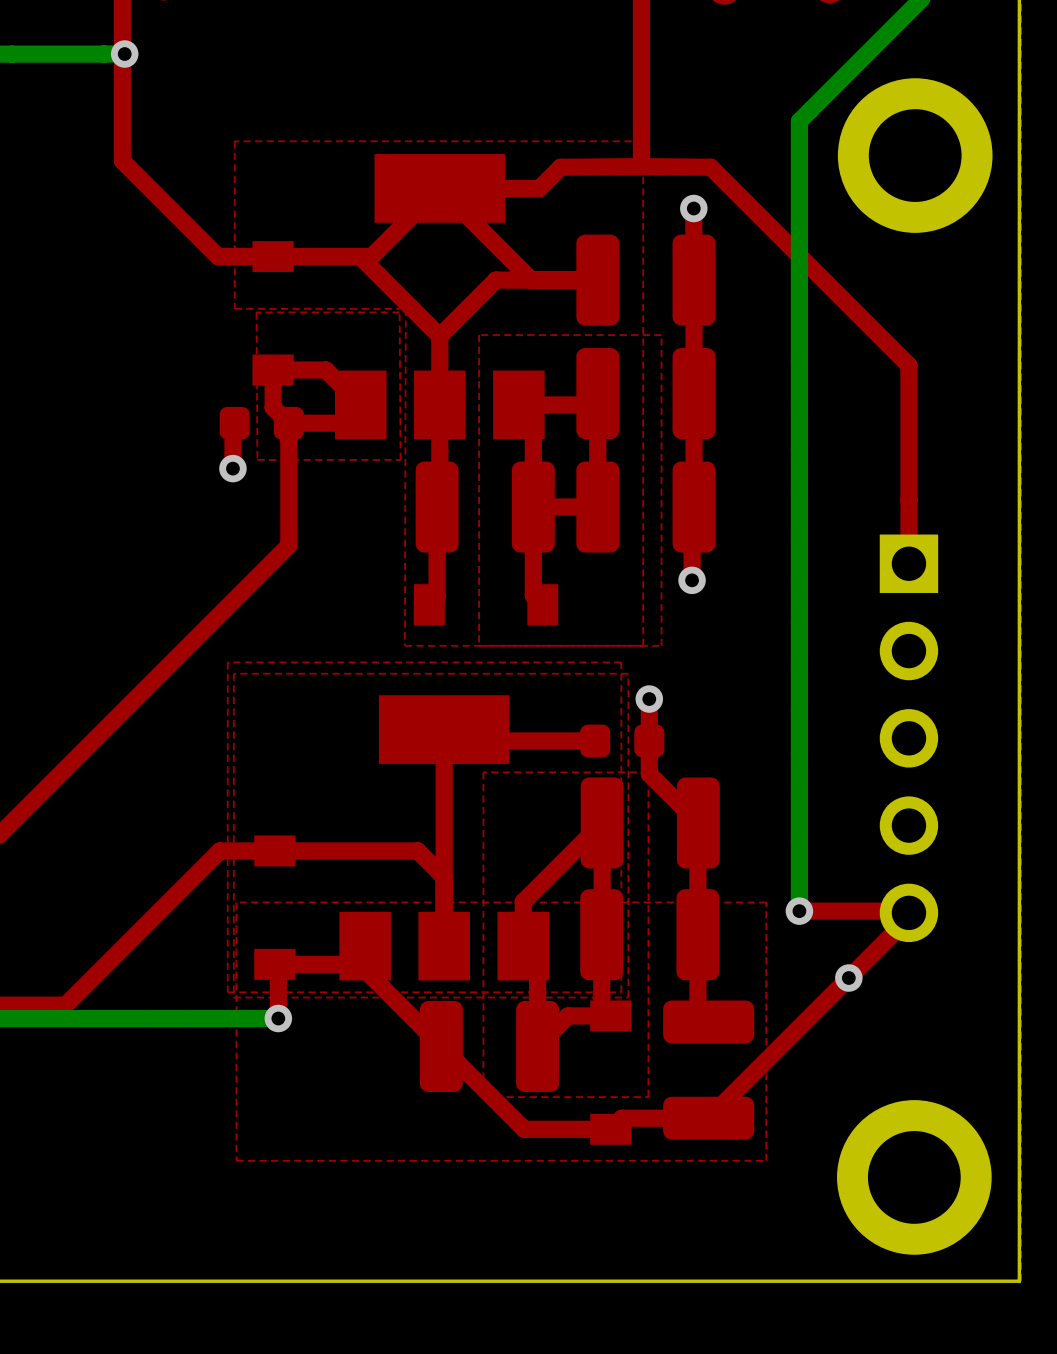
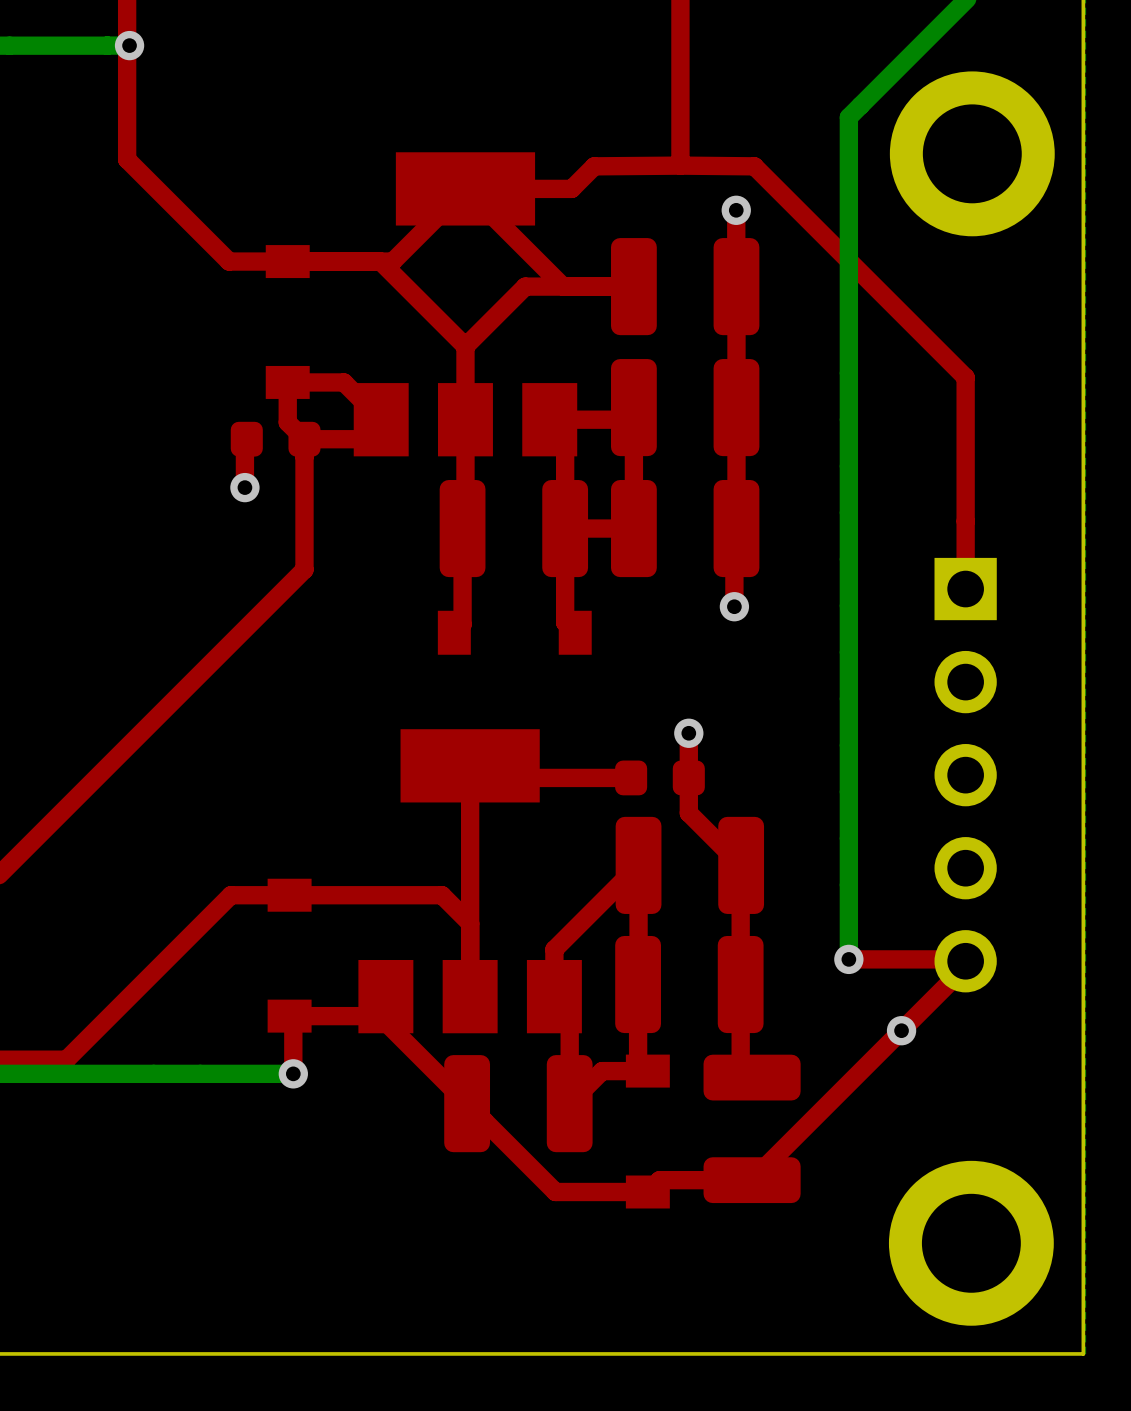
top zone outline: (399, 312) (400, 459) (257, 459) (256, 312) (399, 312) -> none
top zone outline: (643, 645) (643, 141) (234, 141) (234, 308) (405, 308) (404, 645) (661, 645) (661, 335) (479, 335) (479, 645) -> none
top zone outline: (621, 662) (621, 992) (227, 992) (227, 662) (621, 662) -> none
top zone outline: (628, 673) (628, 997) (233, 997) (233, 673) (628, 673) -> none
top zone outline: (648, 772) (648, 1097) (483, 1097) (483, 772) (648, 772) -> none
top zone outline: (766, 902) (766, 1160) (236, 1160) (236, 902) (766, 902) -> none

